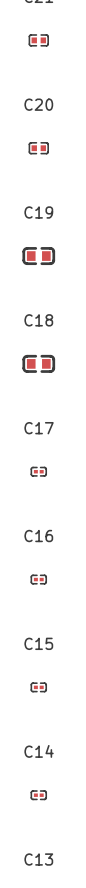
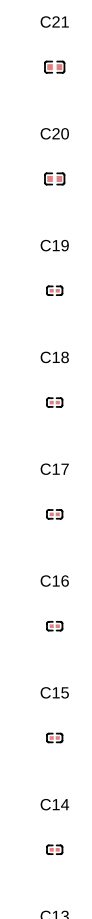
C19 footprint: [22, 247, 56, 266] -> [46, 285, 64, 296]
C18 footprint: [22, 354, 56, 373] -> [46, 397, 64, 408]

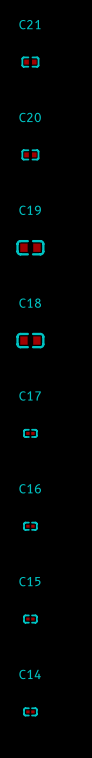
C19 footprint: [46, 285, 64, 296] -> [16, 239, 45, 256]
C18 footprint: [46, 397, 64, 408] -> [16, 332, 45, 349]

